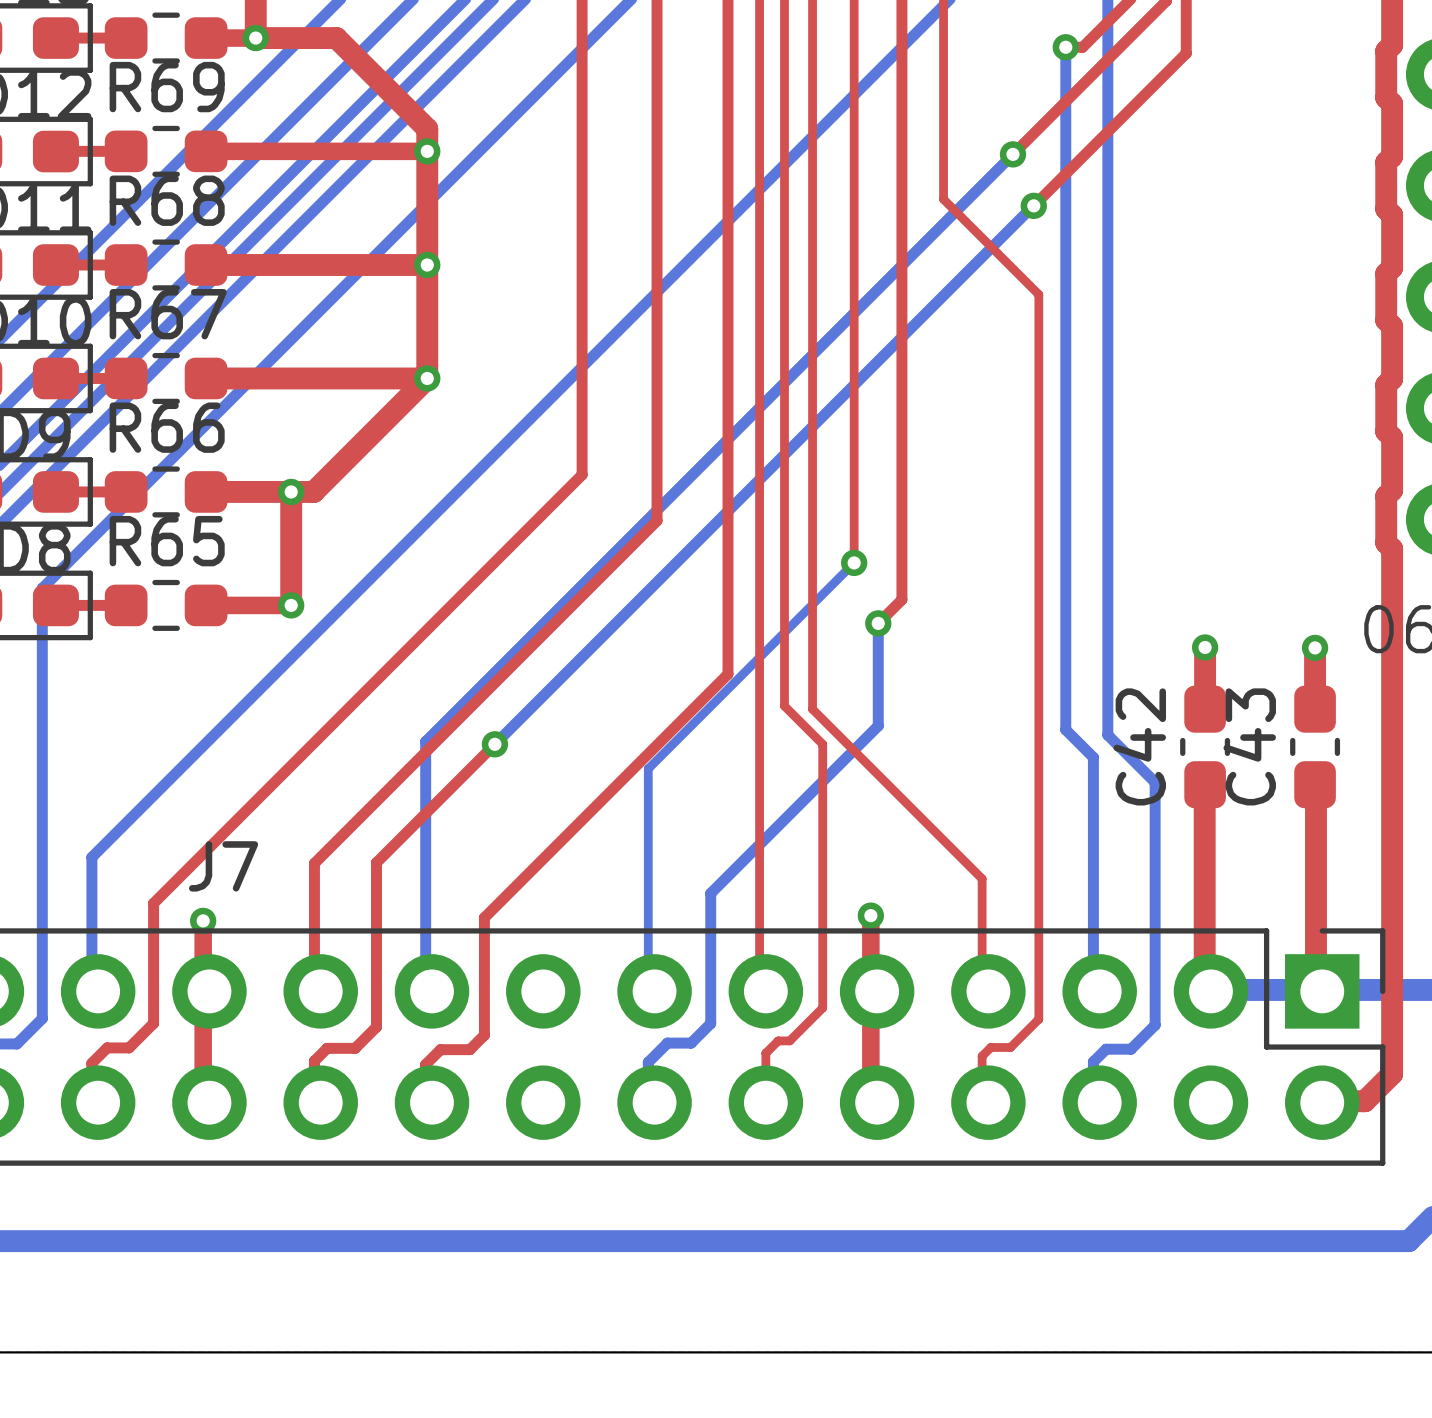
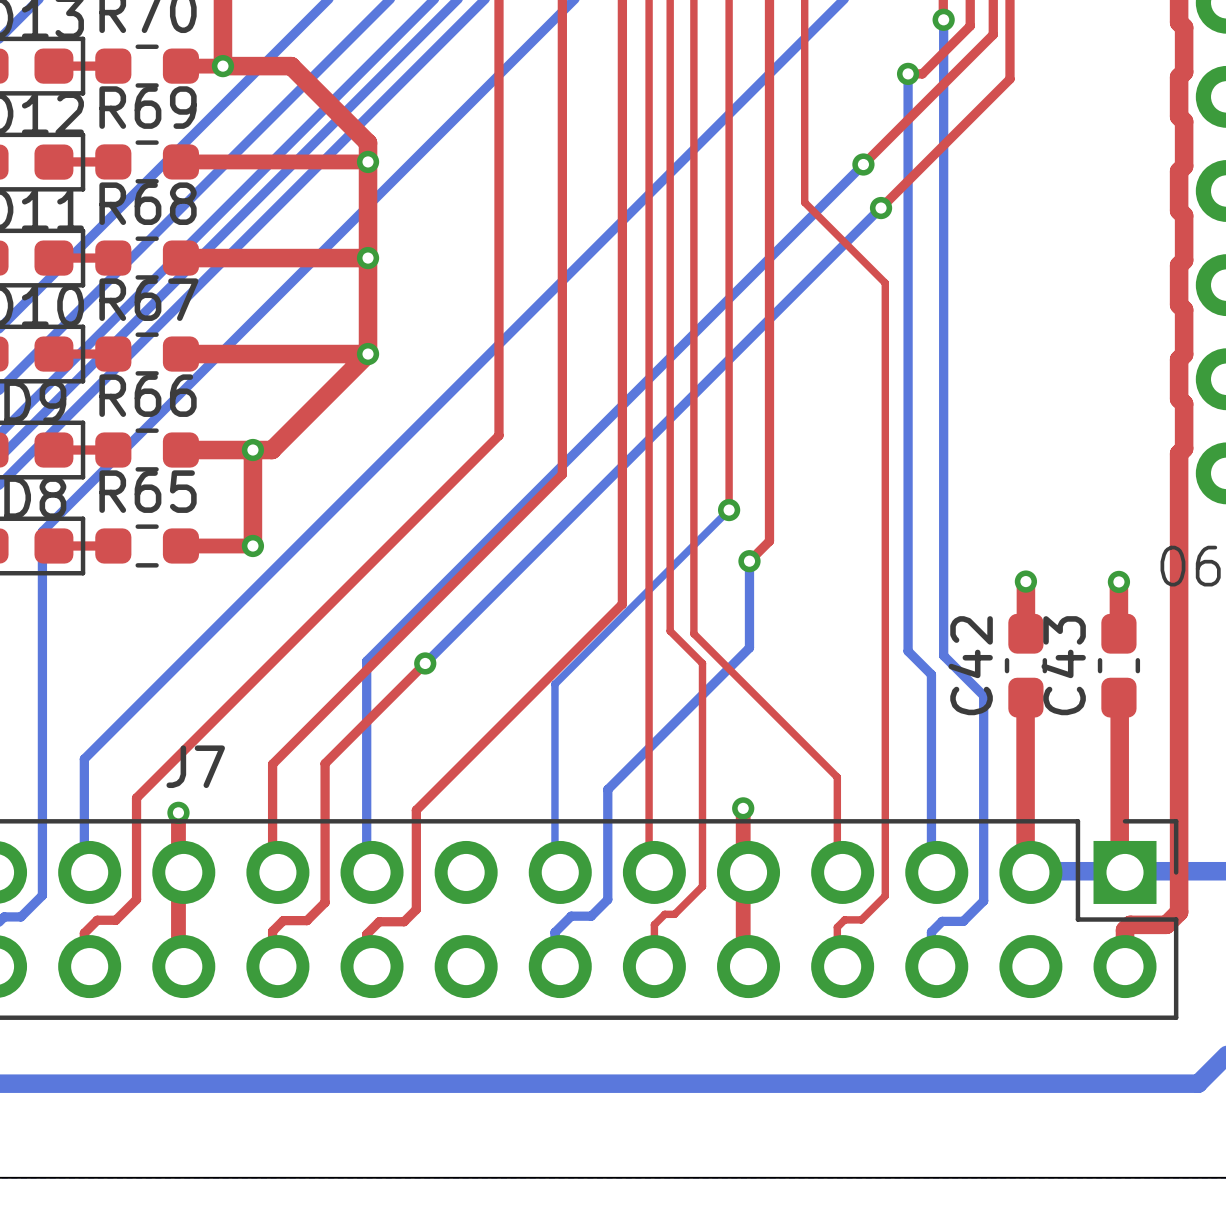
top track: (1386, 542) (1392, 548) (1392, 1074) (1364, 1101) (1315, 1101) -> (1179, 493) (1179, 912) (1166, 924) (1130, 924) (1125, 930) (1125, 966)

